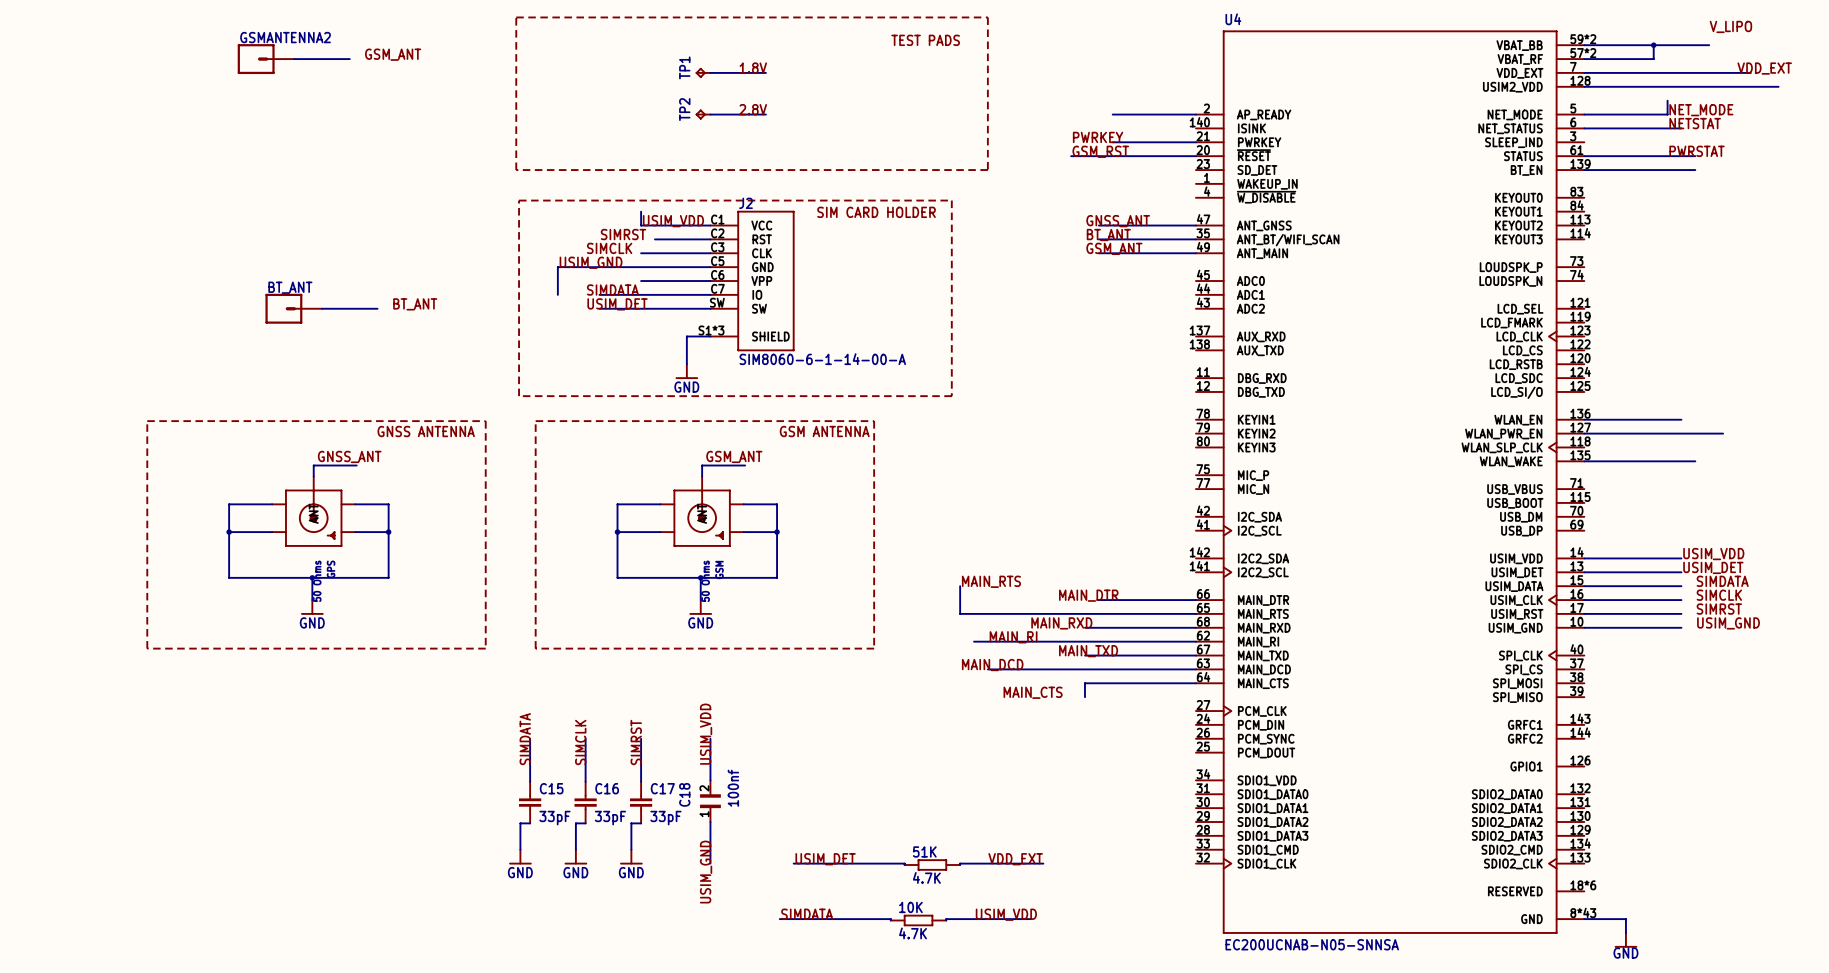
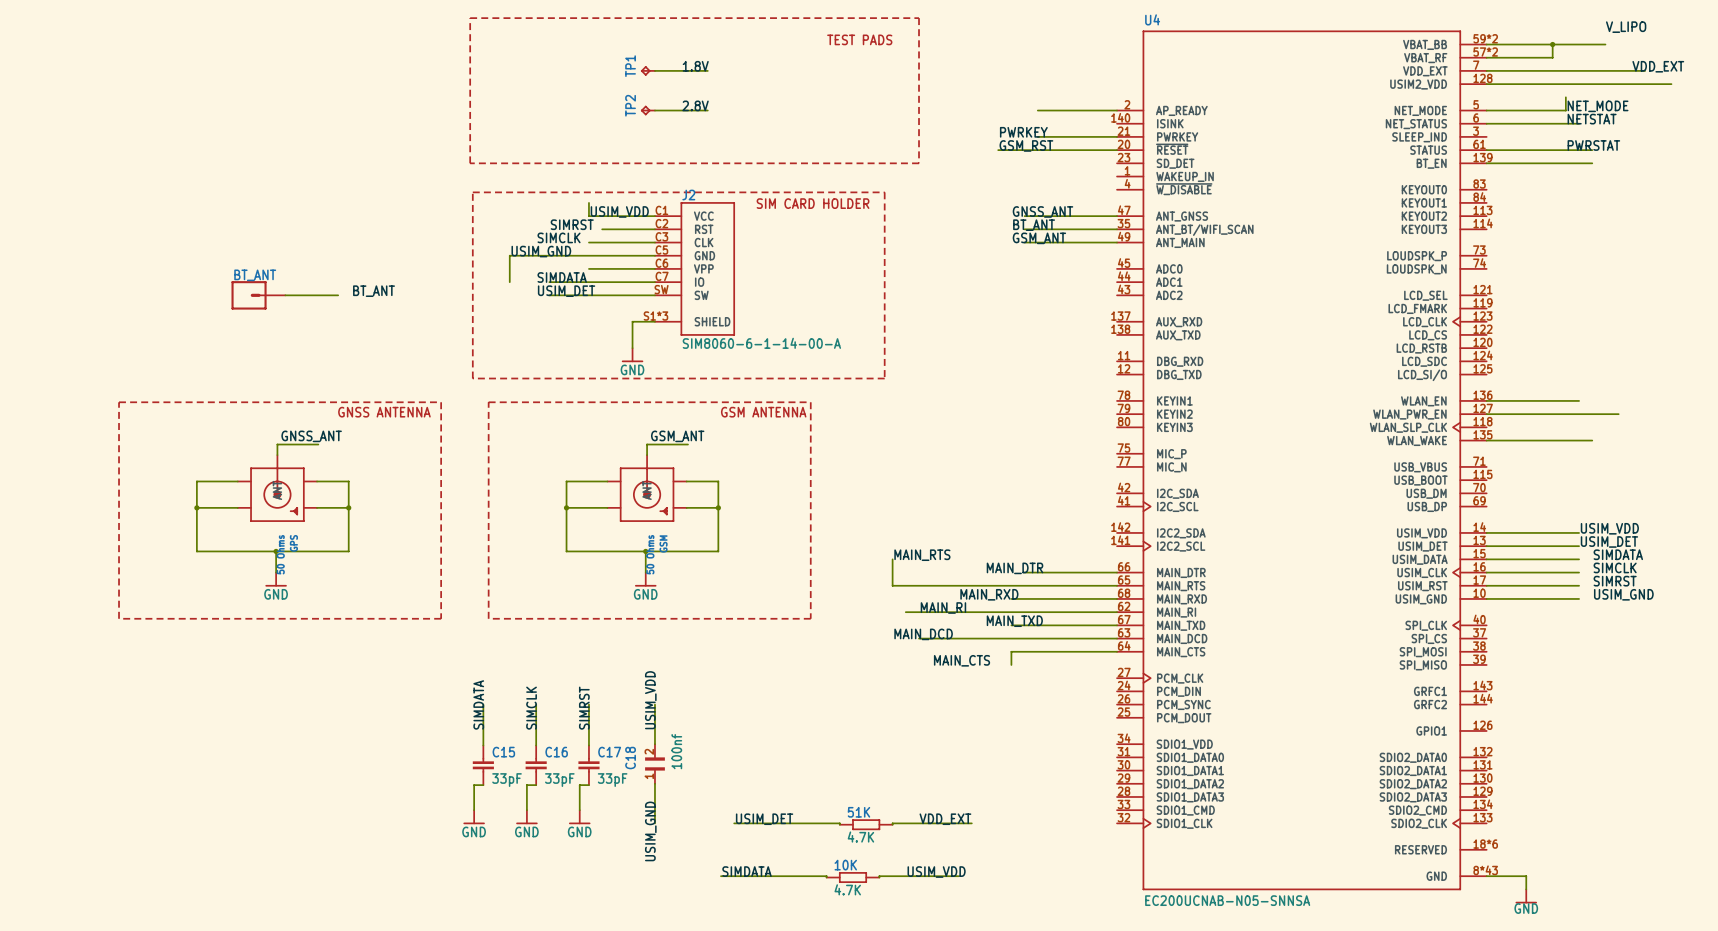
label: GSM_ANT (393, 54) -> none
GSMANTENNA2: (266, 59) -> none
wire: (294, 59) (349, 59) -> none

